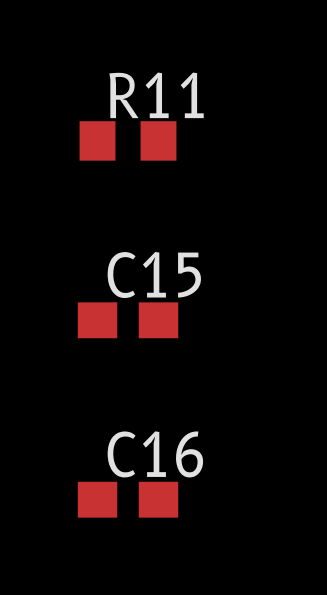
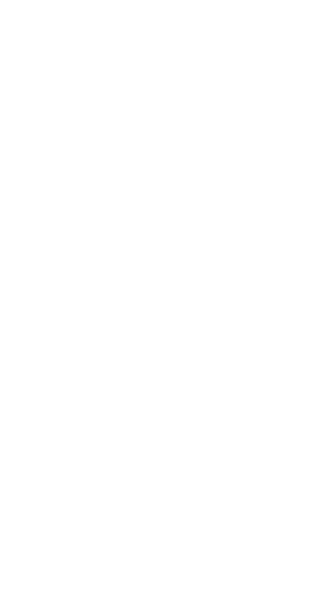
R11: (128, 140) -> none
C15: (128, 320) -> none
C16: (128, 499) -> none

